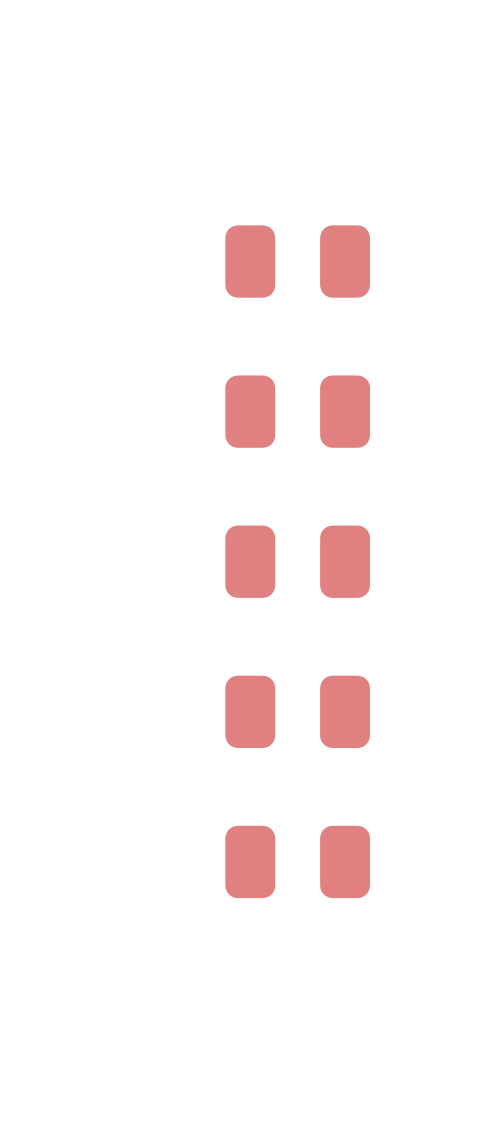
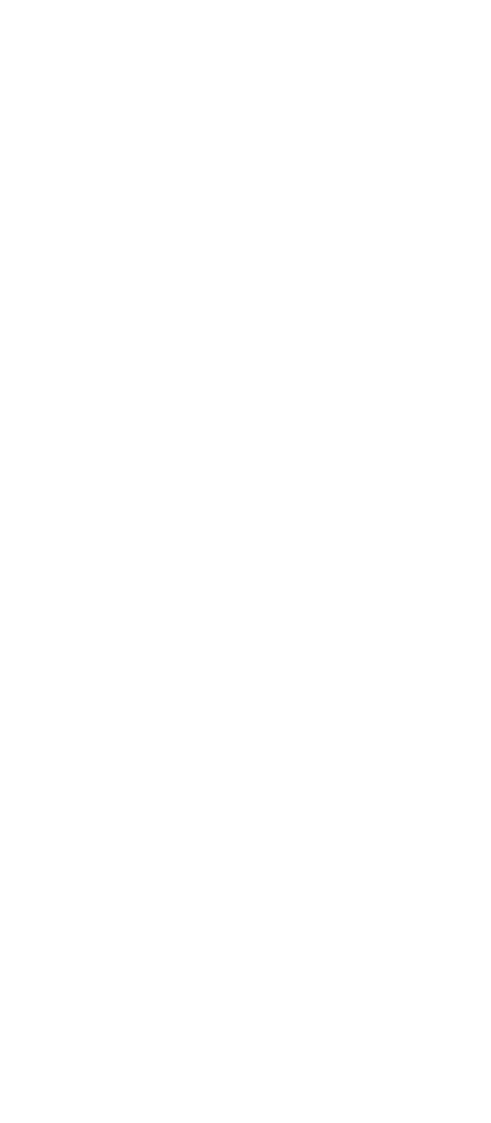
part: (297, 261) -> none
part: (297, 411) -> none
part: (297, 561) -> none
part: (297, 711) -> none
part: (297, 861) -> none

